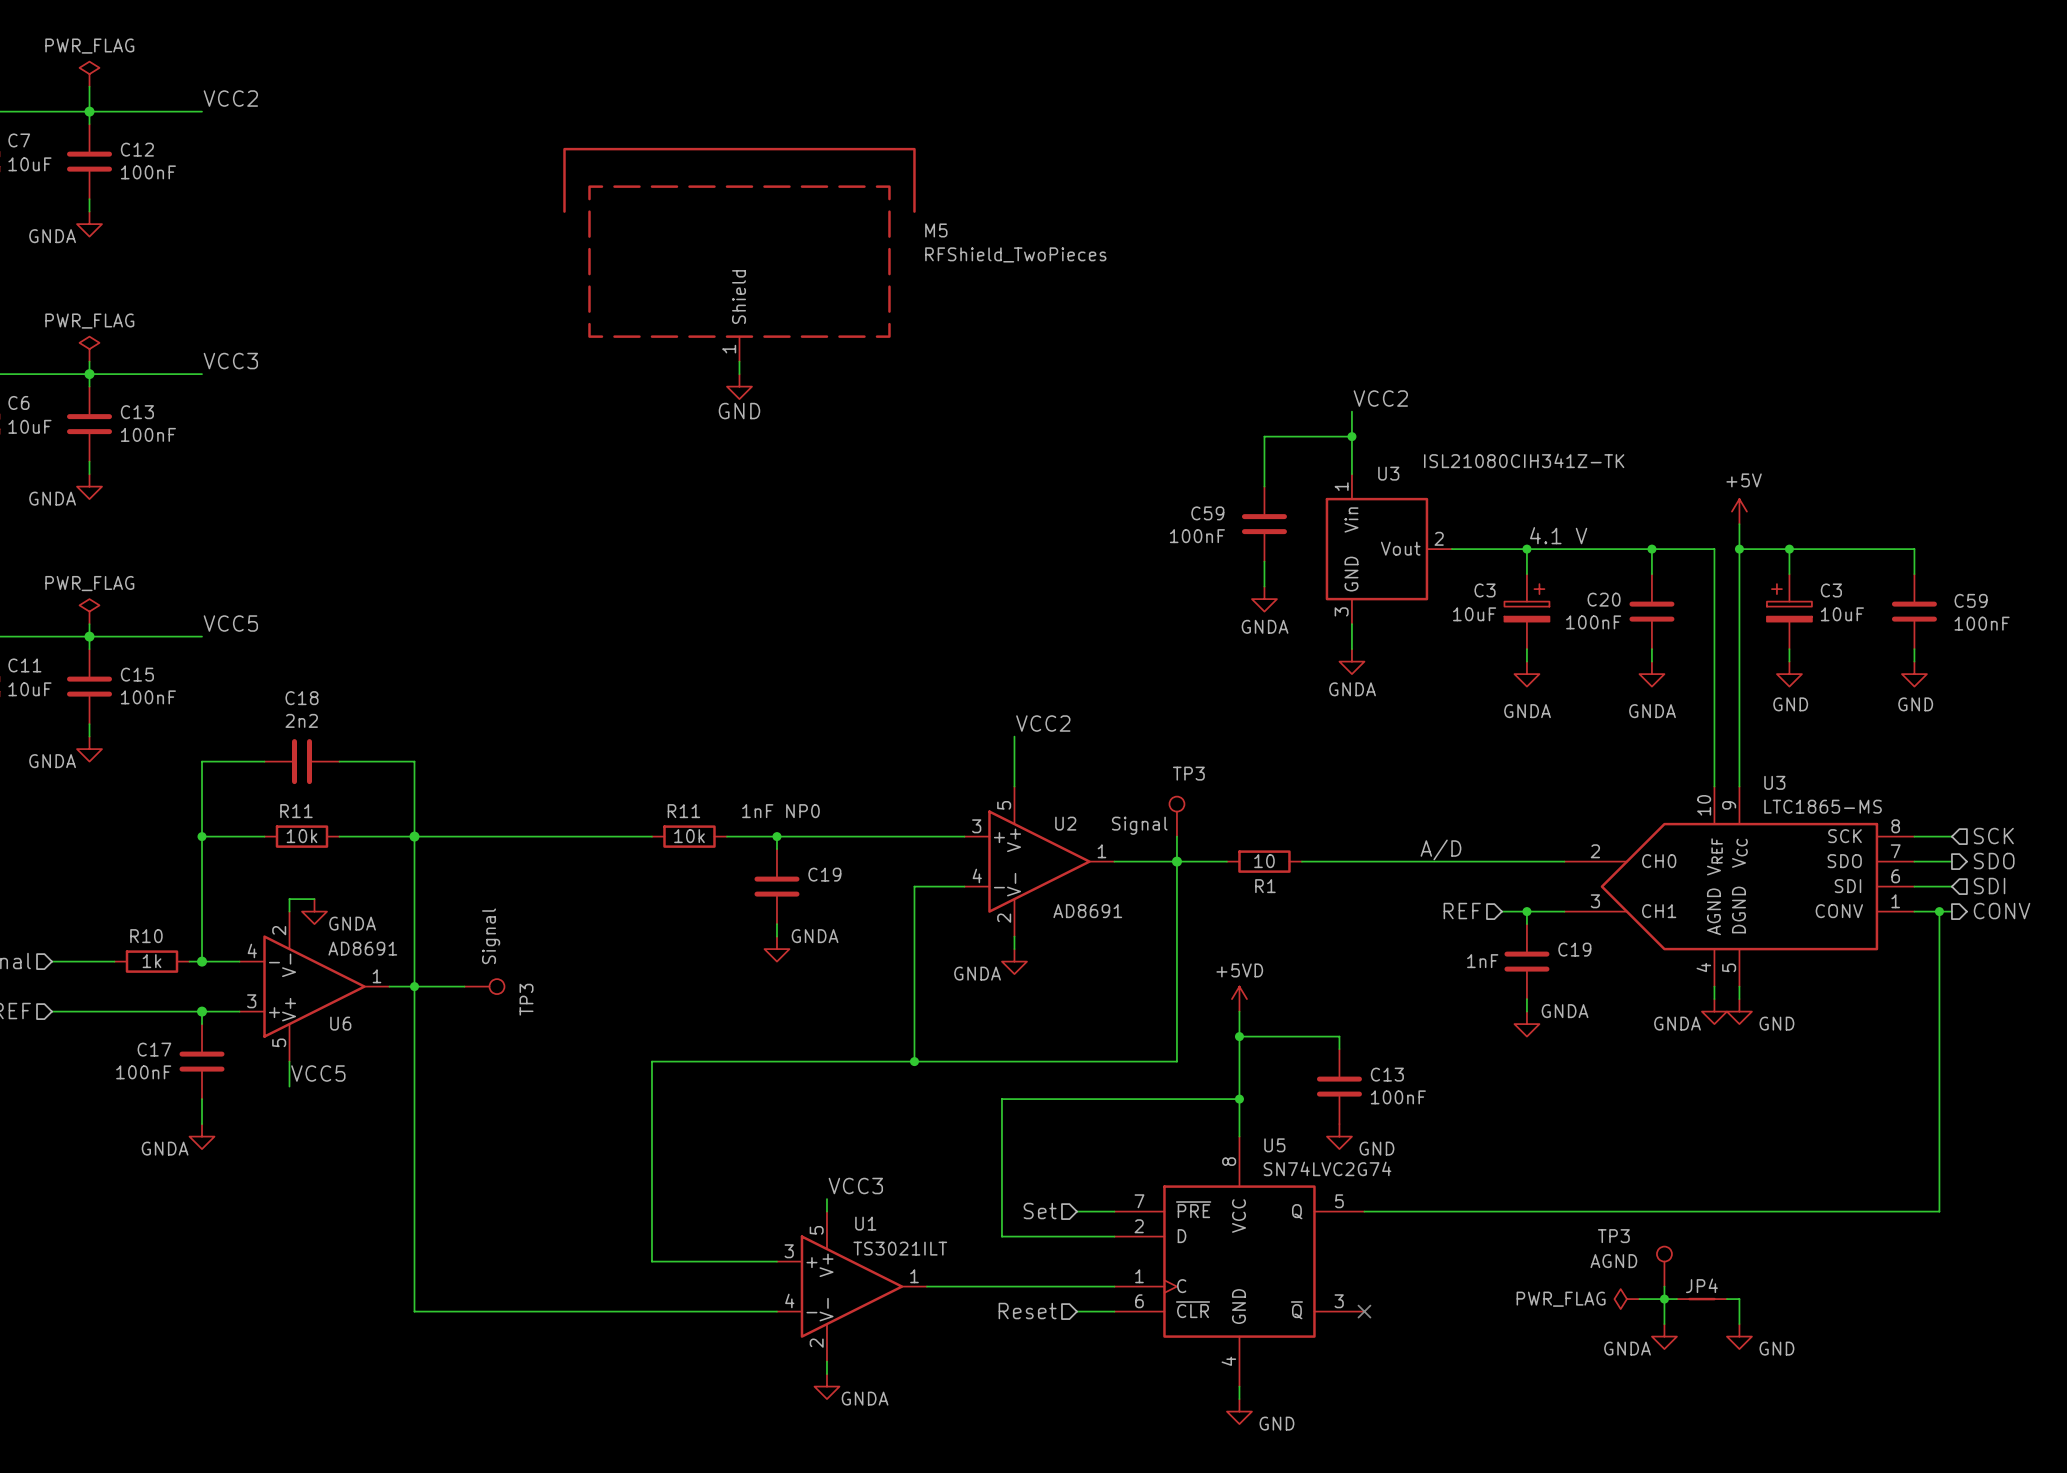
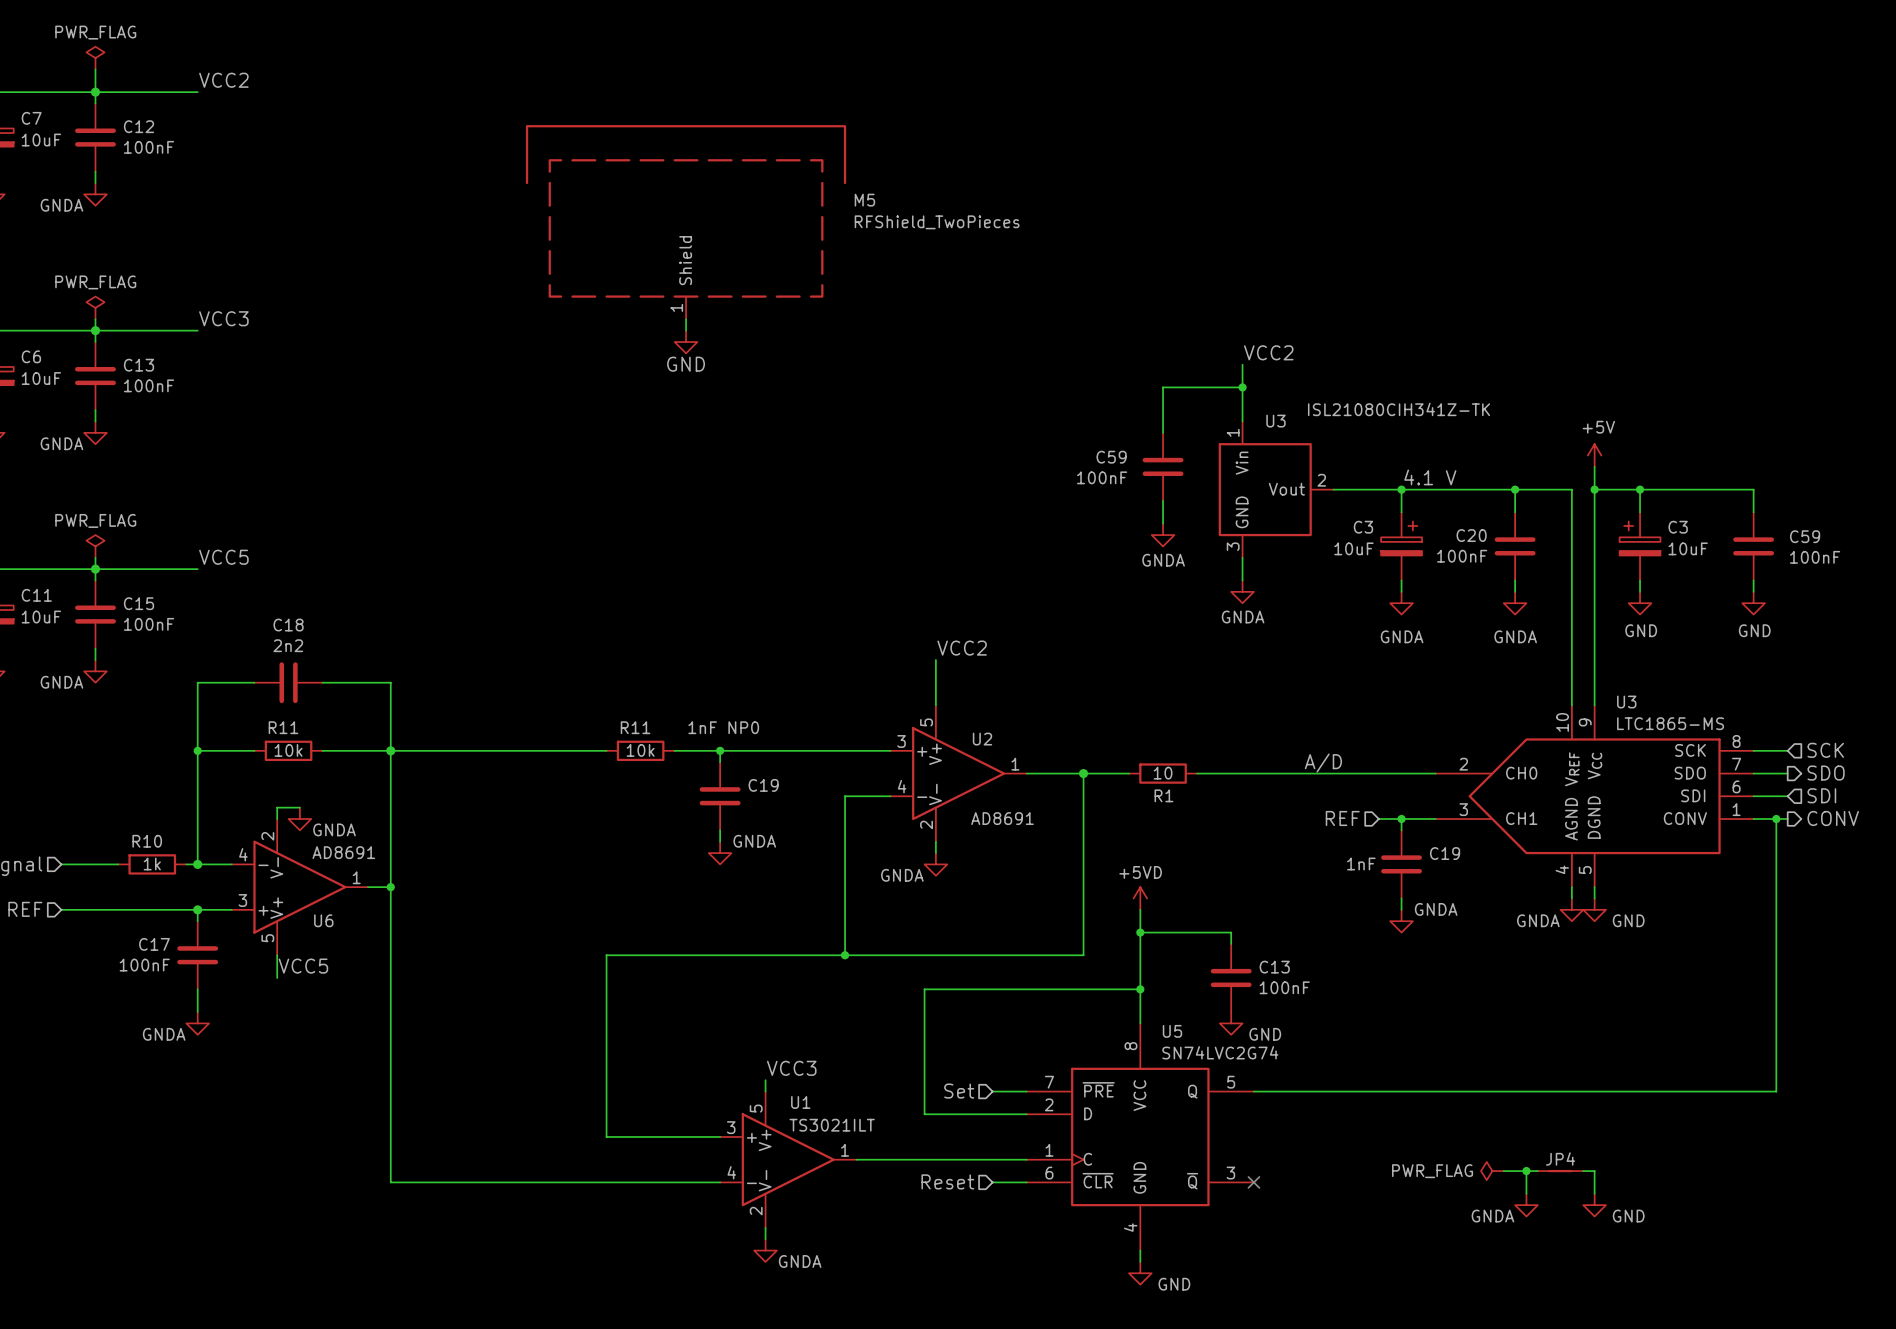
TP3: Signal (1176, 816) -> none
wire: (1176, 836) (1176, 861) -> none
wire: (414, 986) (464, 986) -> none
TP3: Signal (484, 986) -> none
TP3: AGND (1664, 1266) -> none
wire: (1664, 1286) (1664, 1299) -> none

